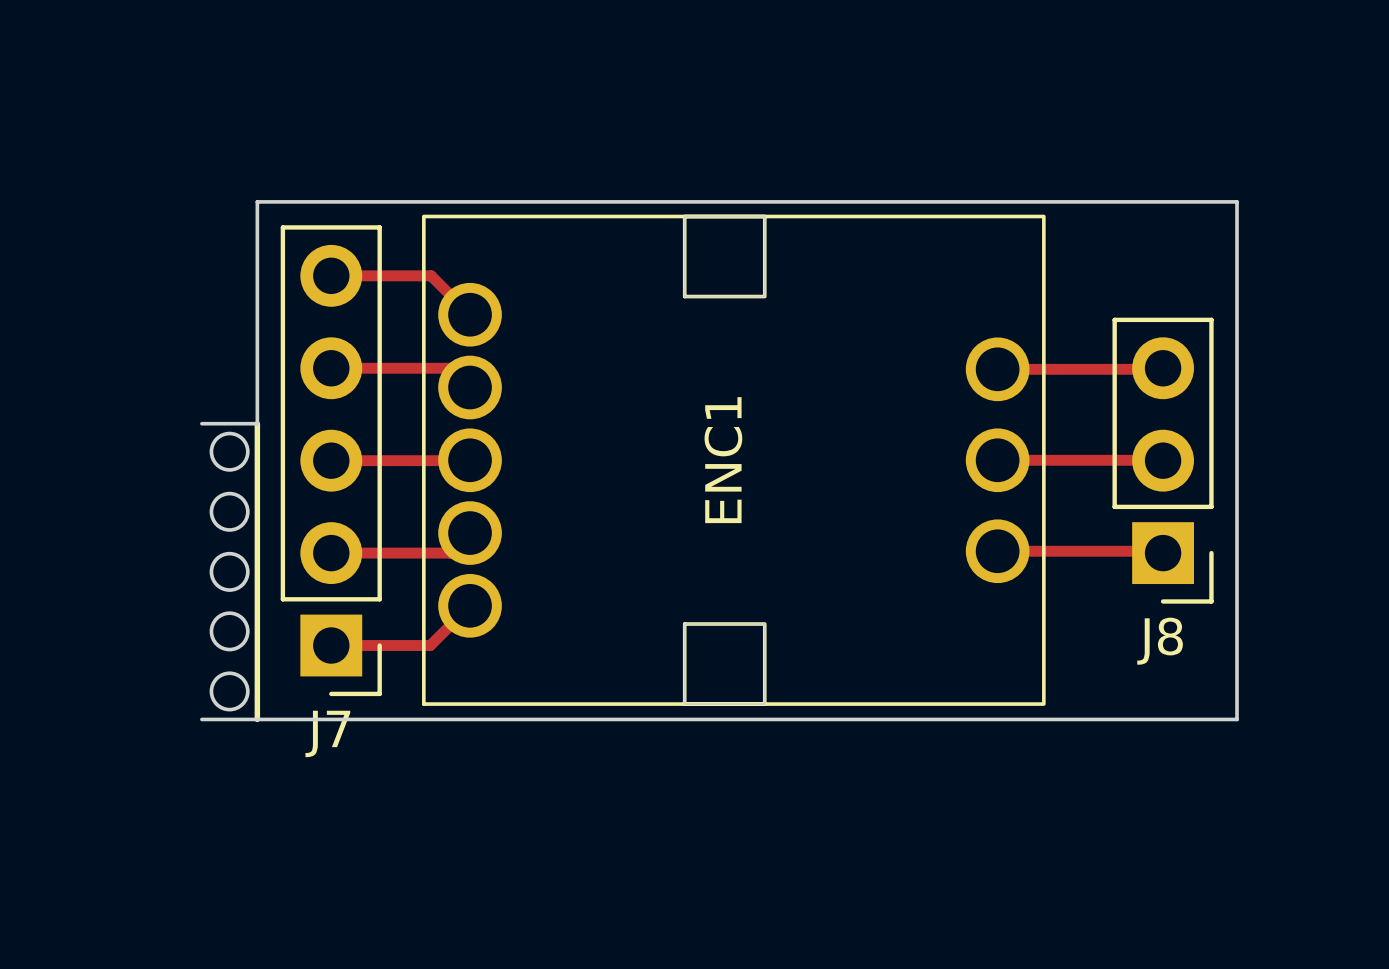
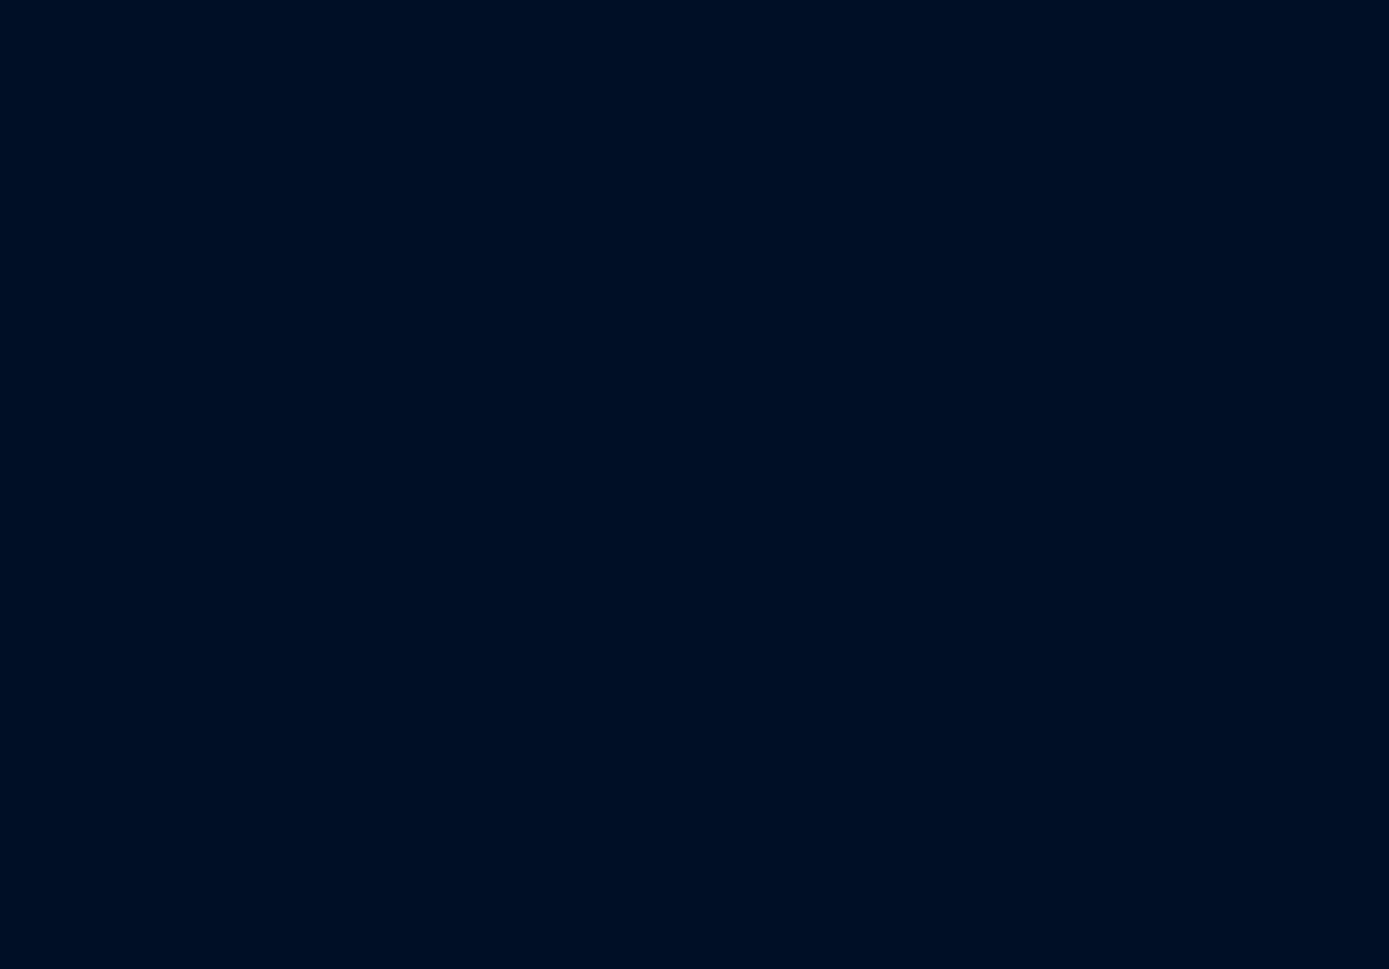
top track: (331, 275) (431, 275) (470, 314) -> none
top track: (331, 368) (450, 368) (470, 387) -> none
top track: (1163, 368) (997, 369) -> none
board edge: (201, 423) (257, 423) (257, 201) (1237, 201) (1237, 719) (201, 719) -> none
line: (257, 423) (257, 719) -> none
round board edge: [209, 431, 250, 472] -> none
top track: (331, 460) (469, 460) -> none
J7: (331, 460) -> none
ENC1: (733, 460) -> none
top track: (997, 460) (1162, 460) -> none
J8: (1163, 460) -> none
round board edge: [209, 491, 250, 532] -> none
top track: (470, 533) (450, 553) (331, 553) -> none
round board edge: [209, 551, 250, 592] -> none
top track: (997, 551) (1161, 551) (1163, 553) (1161, 551) -> none
top track: (470, 605) (430, 645) (331, 645) -> none
round board edge: [209, 611, 250, 652] -> none
round board edge: [209, 671, 250, 712] -> none

